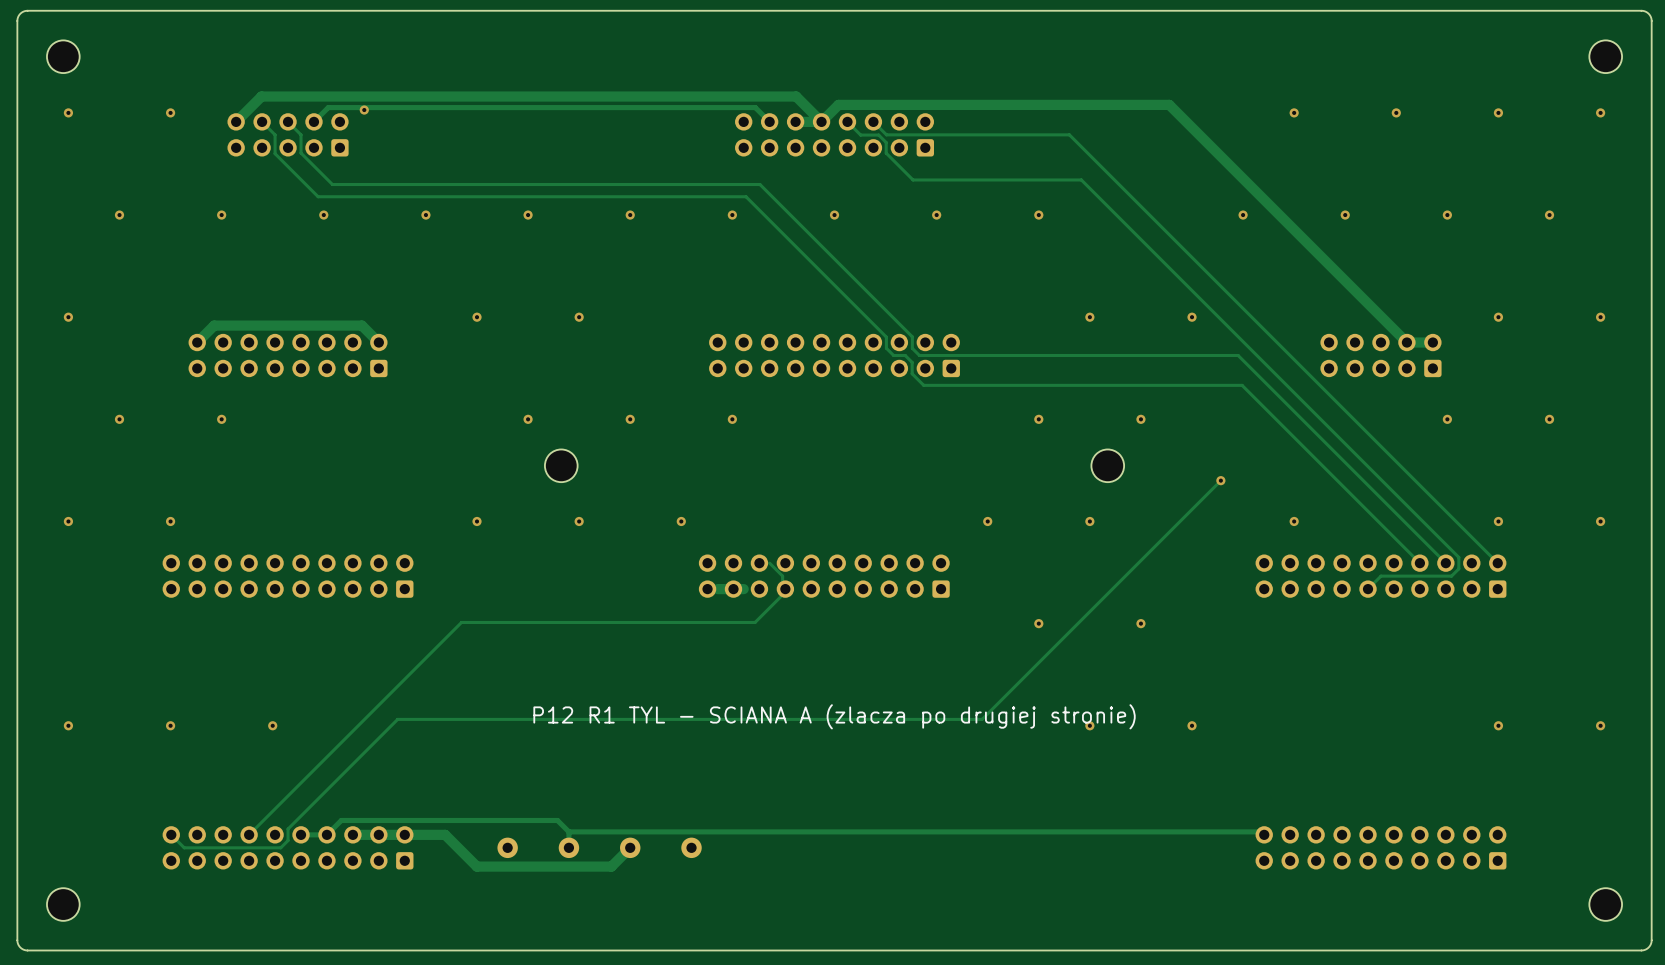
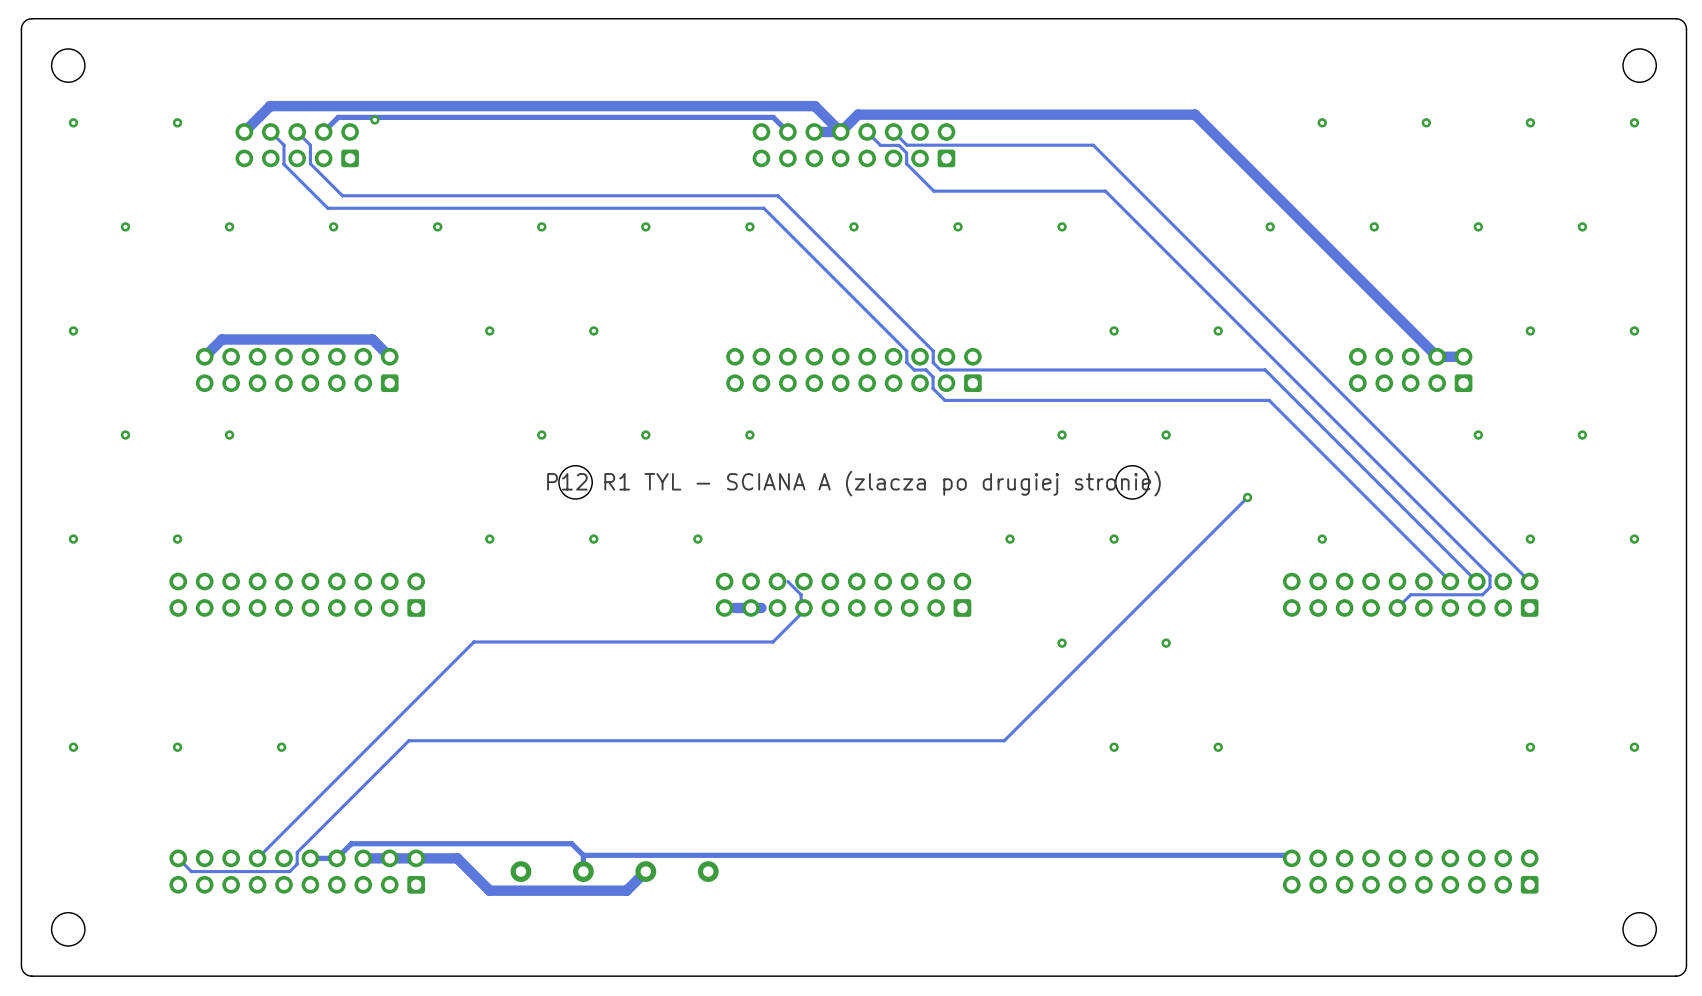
text position: P12 R1 TYL - SCIANA A (zlacza po drugiej stronie) (834, 716) -> P12 R1 TYL - SCIANA A (zlacza po drugiej stronie) (853, 483)

